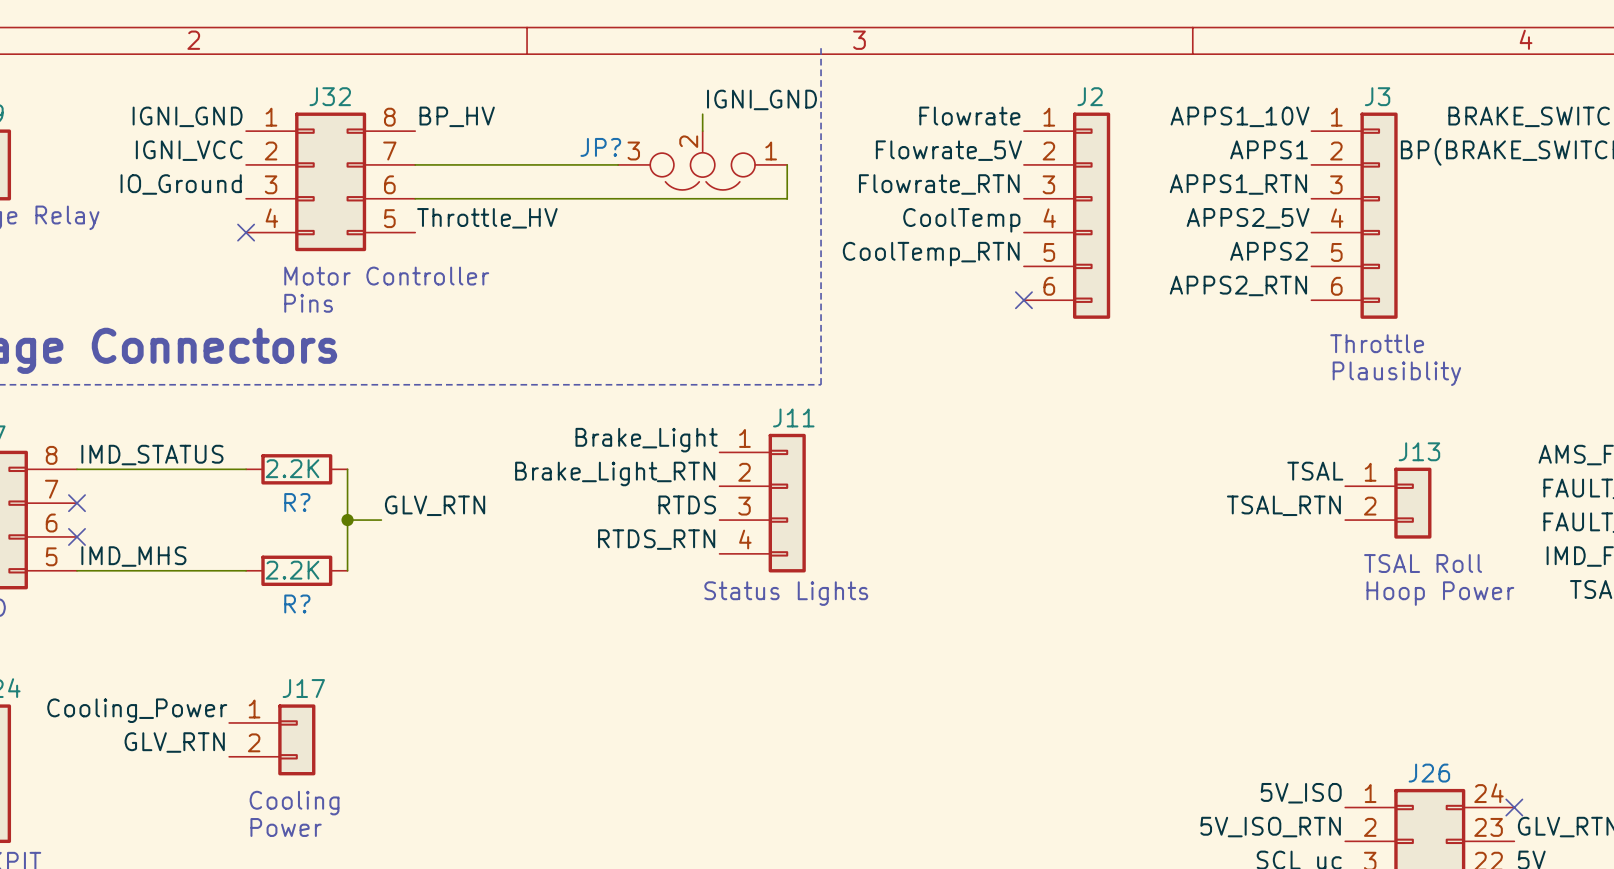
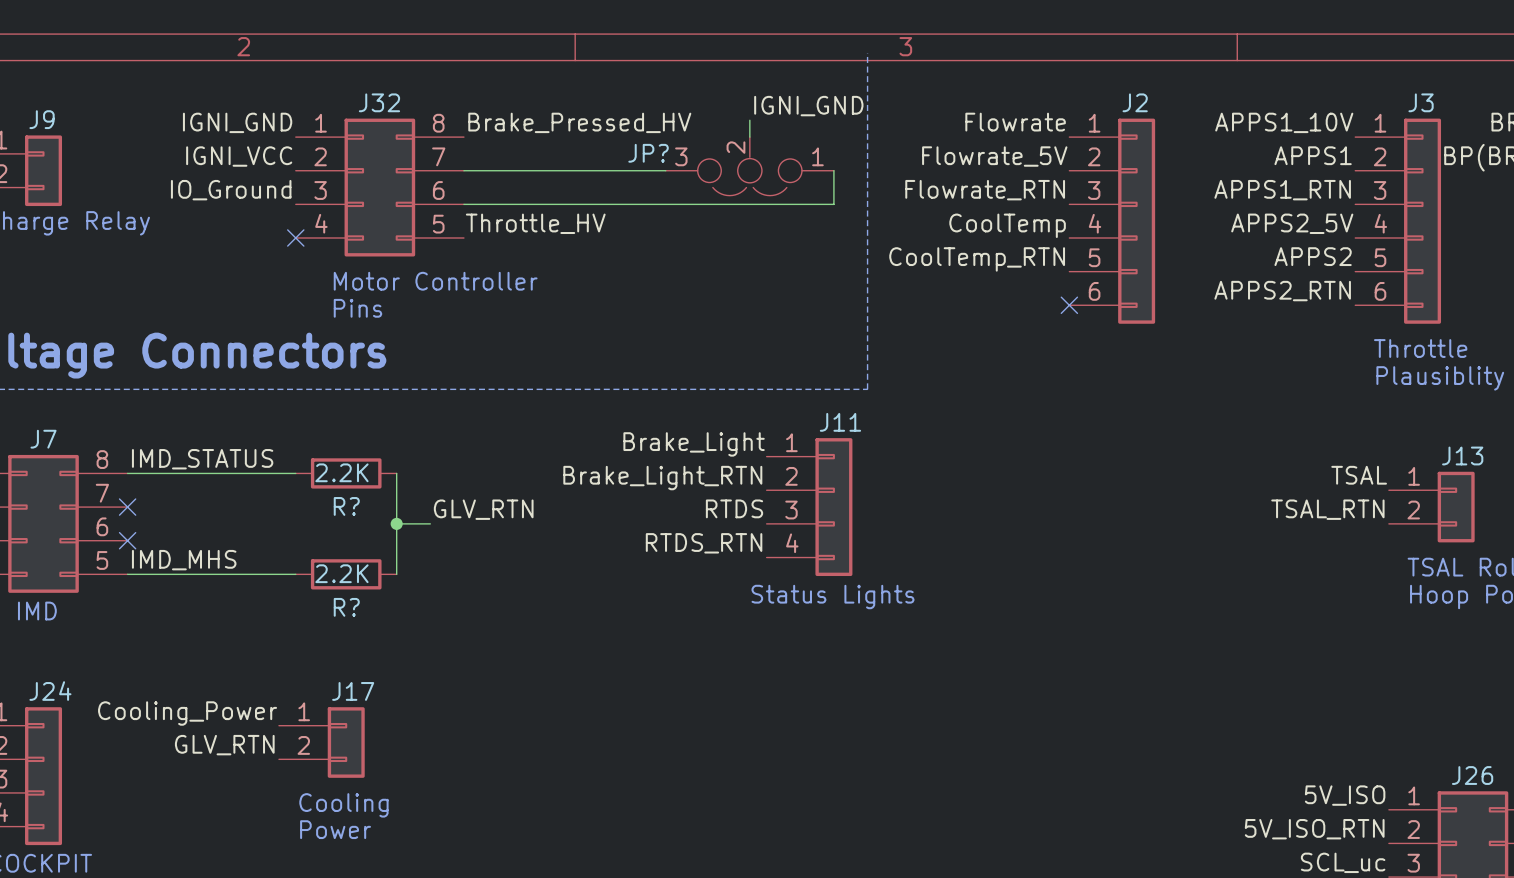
label: BP_HV (457, 116) -> Brake_Pressed_HV (579, 122)

